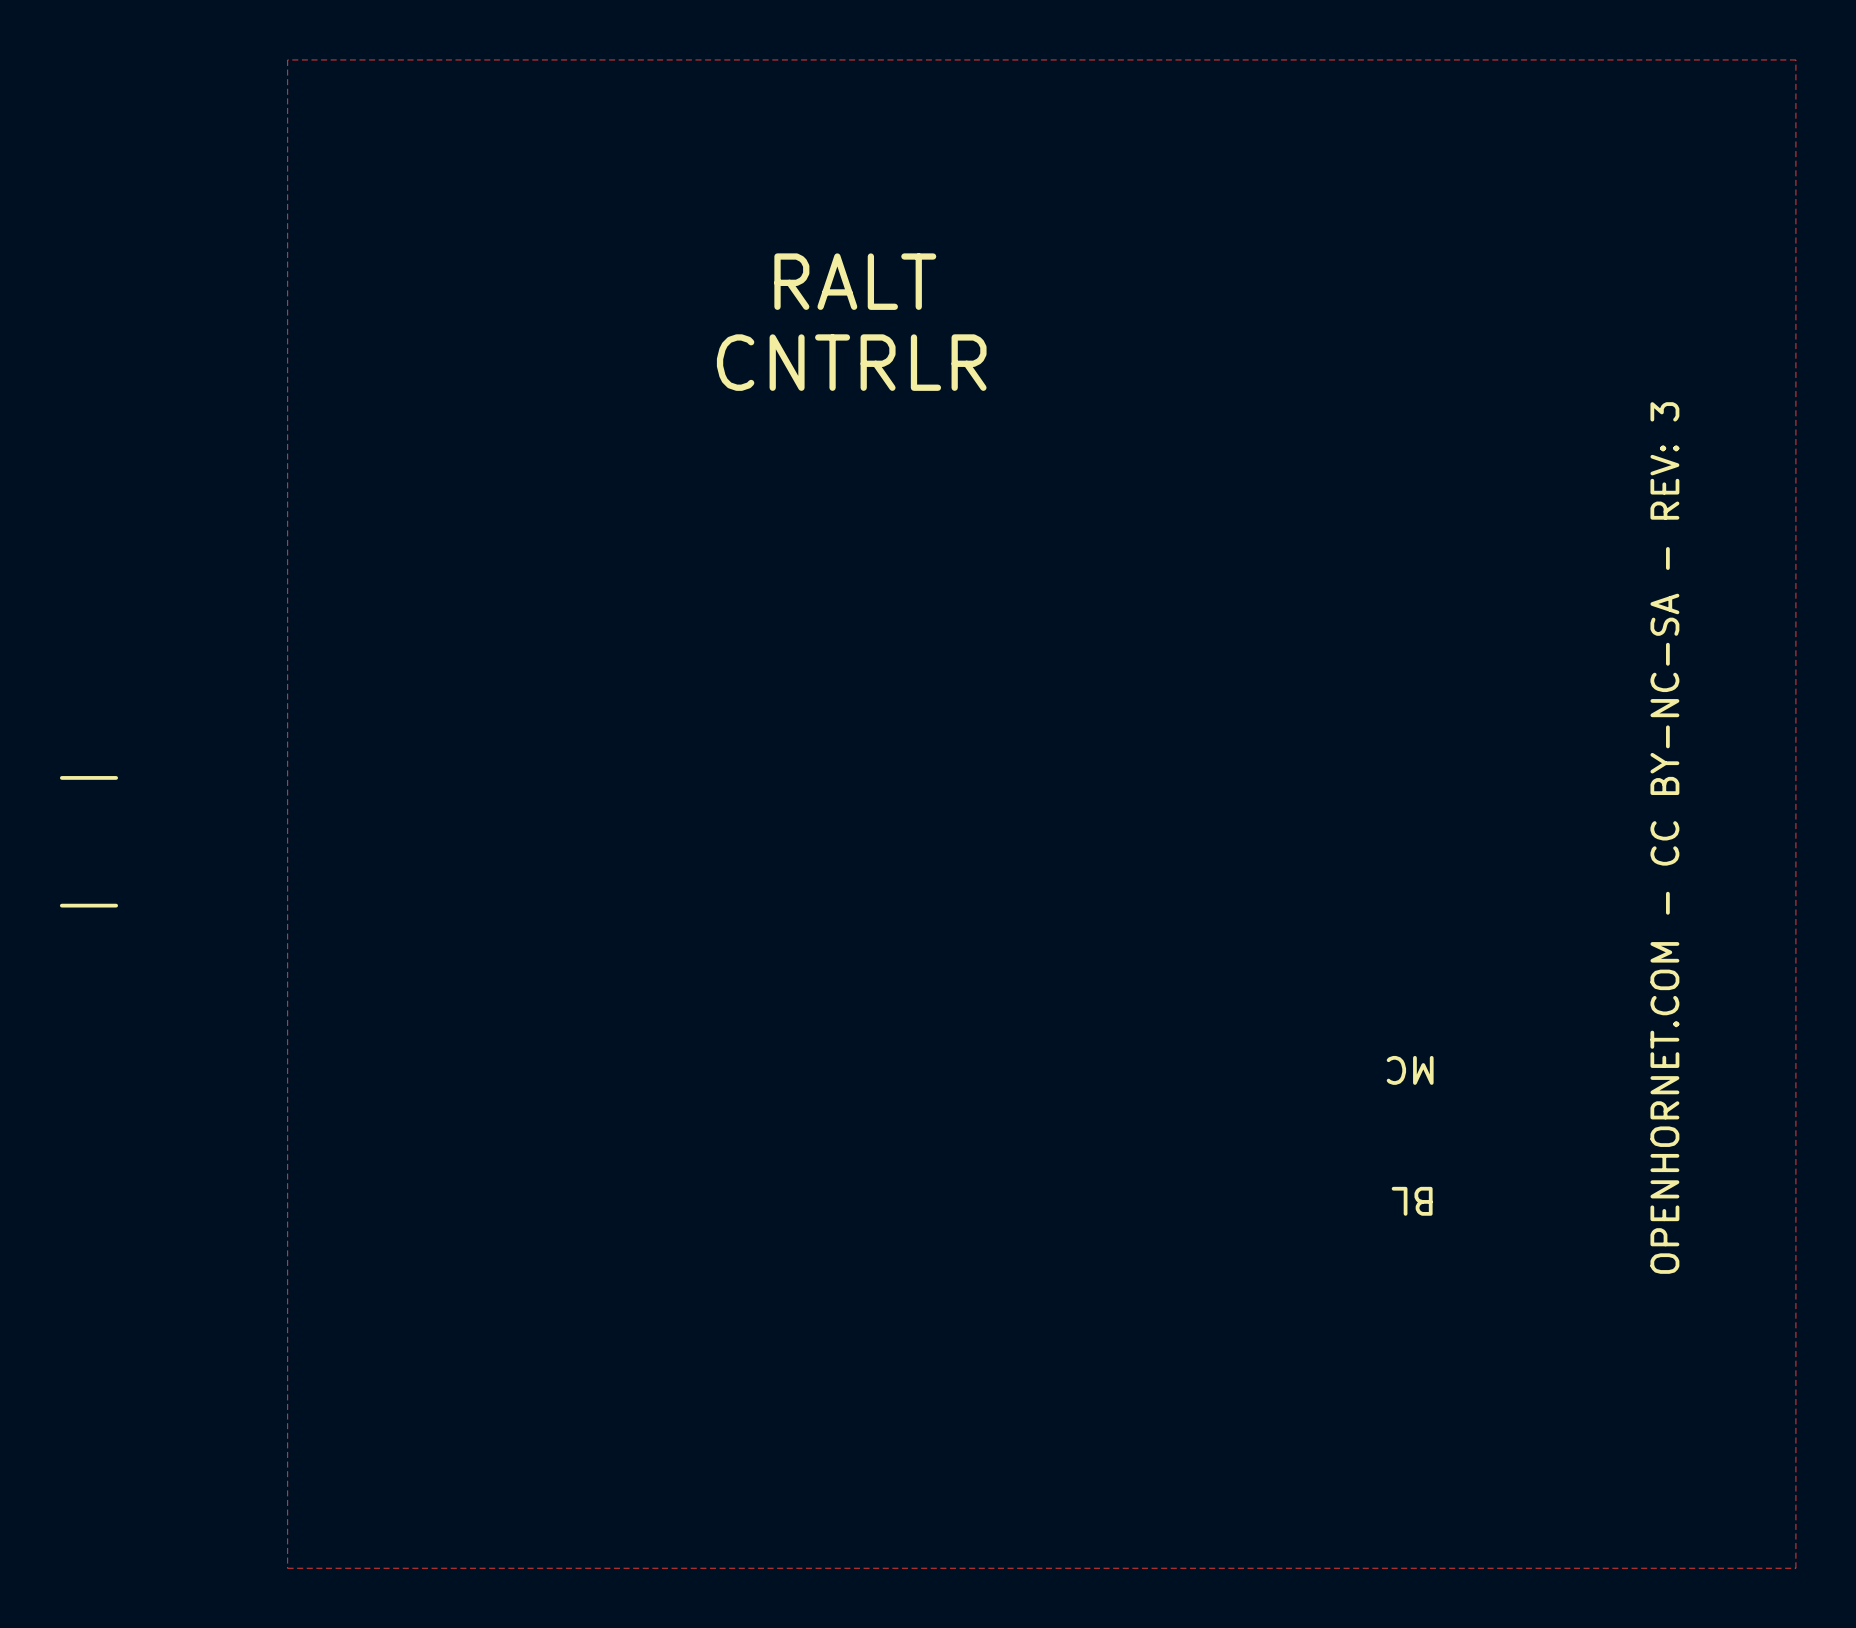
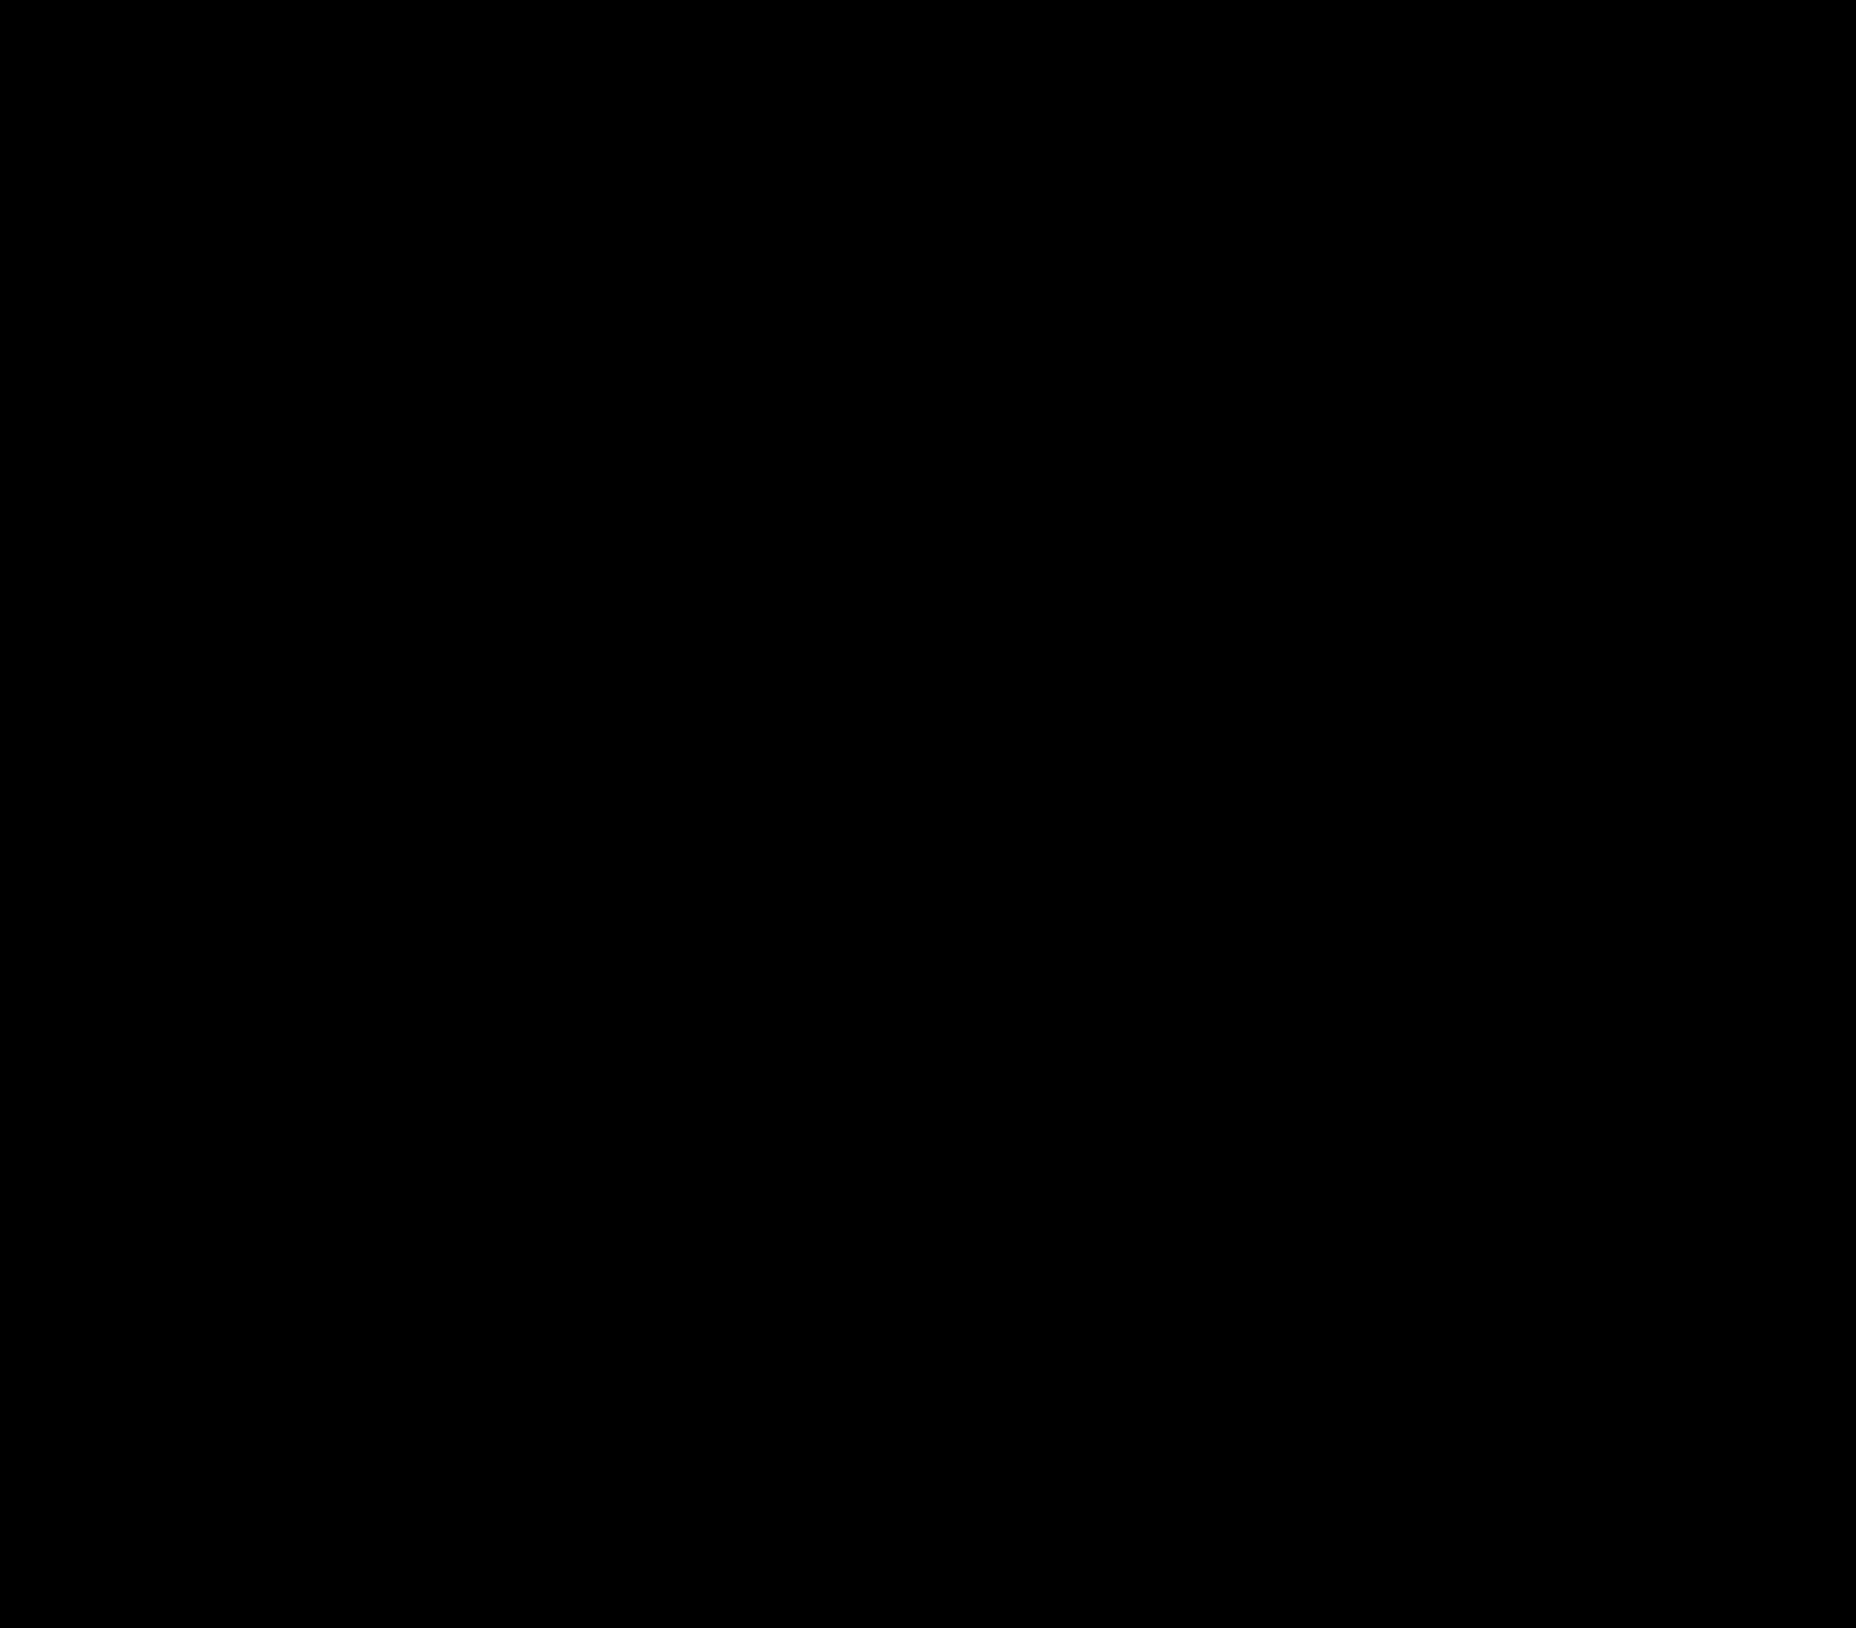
top zone outline: (1795, 59) (1795, 1568) (287, 1568) (287, 59) (1795, 59) -> none
text: RALT (855, 281) -> none
text: CNTRLR (851, 362) -> none
line: (116, 777) (61, 777) -> none
text: OPENHORNET.COM - CC BY-NC-SA - REV: 3 (1664, 838) -> none
line: (116, 905) (61, 905) -> none
text: MC (1410, 1070) -> none
text: BL (1412, 1201) -> none

